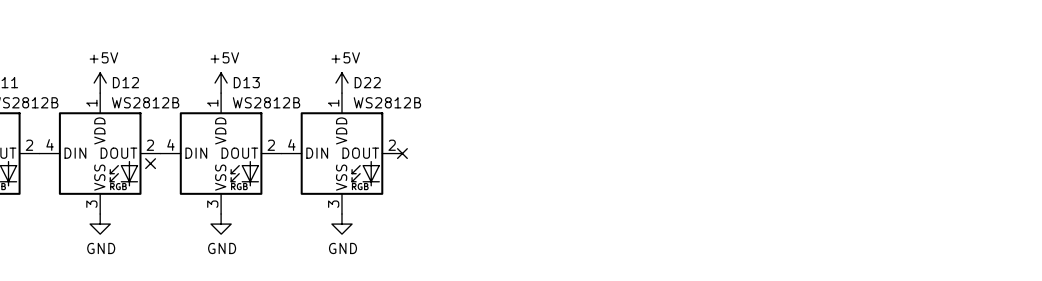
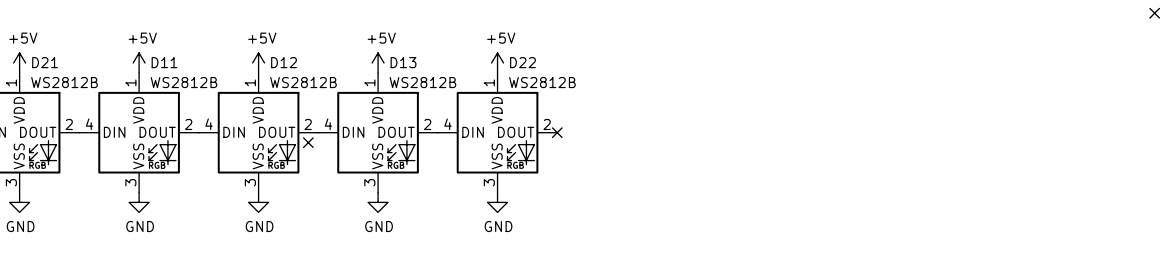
no-connect mark: none -> (1154, 13)

